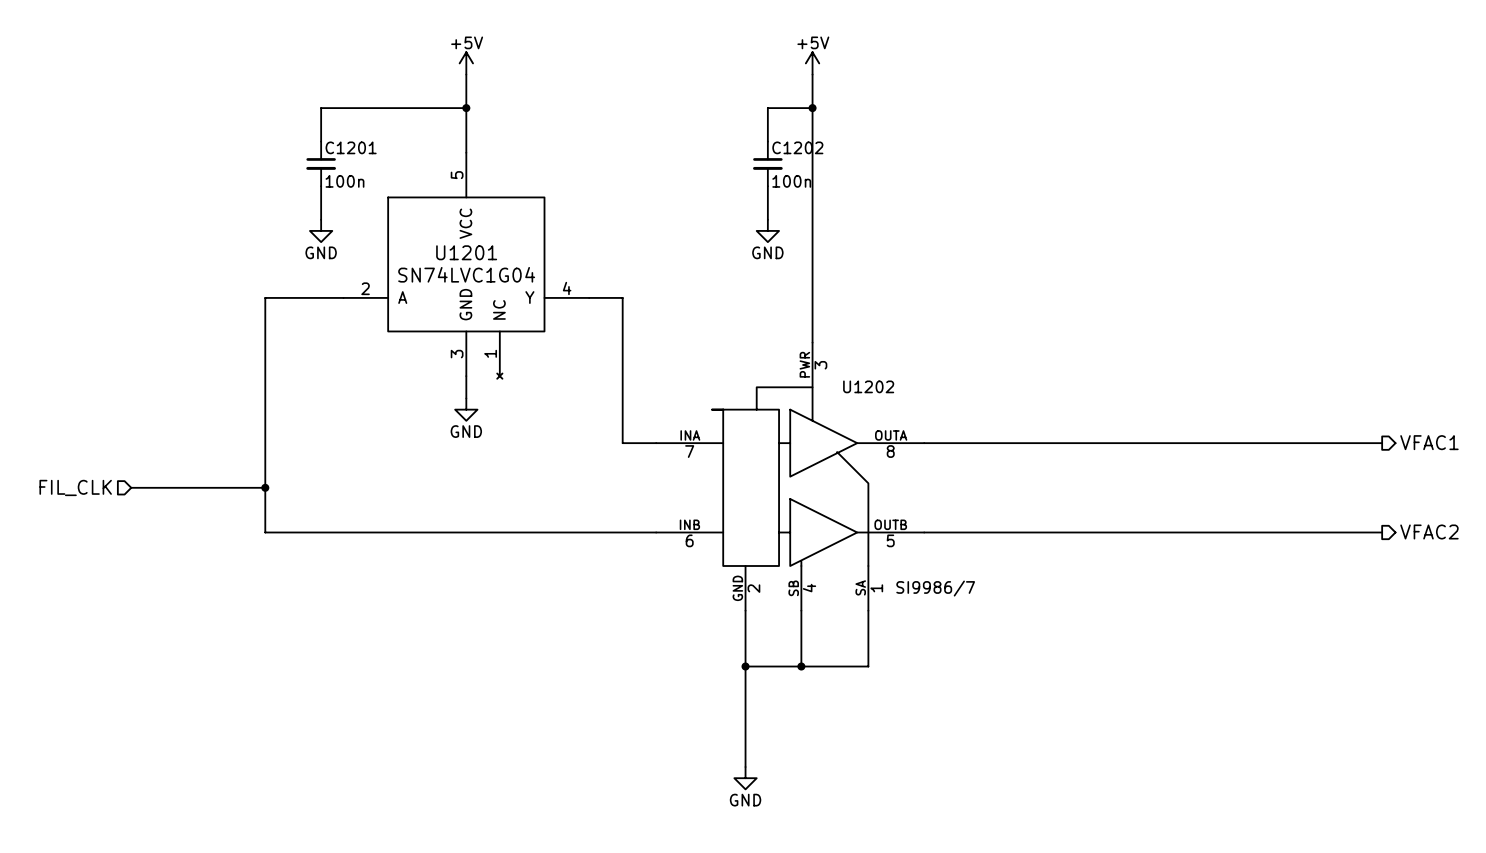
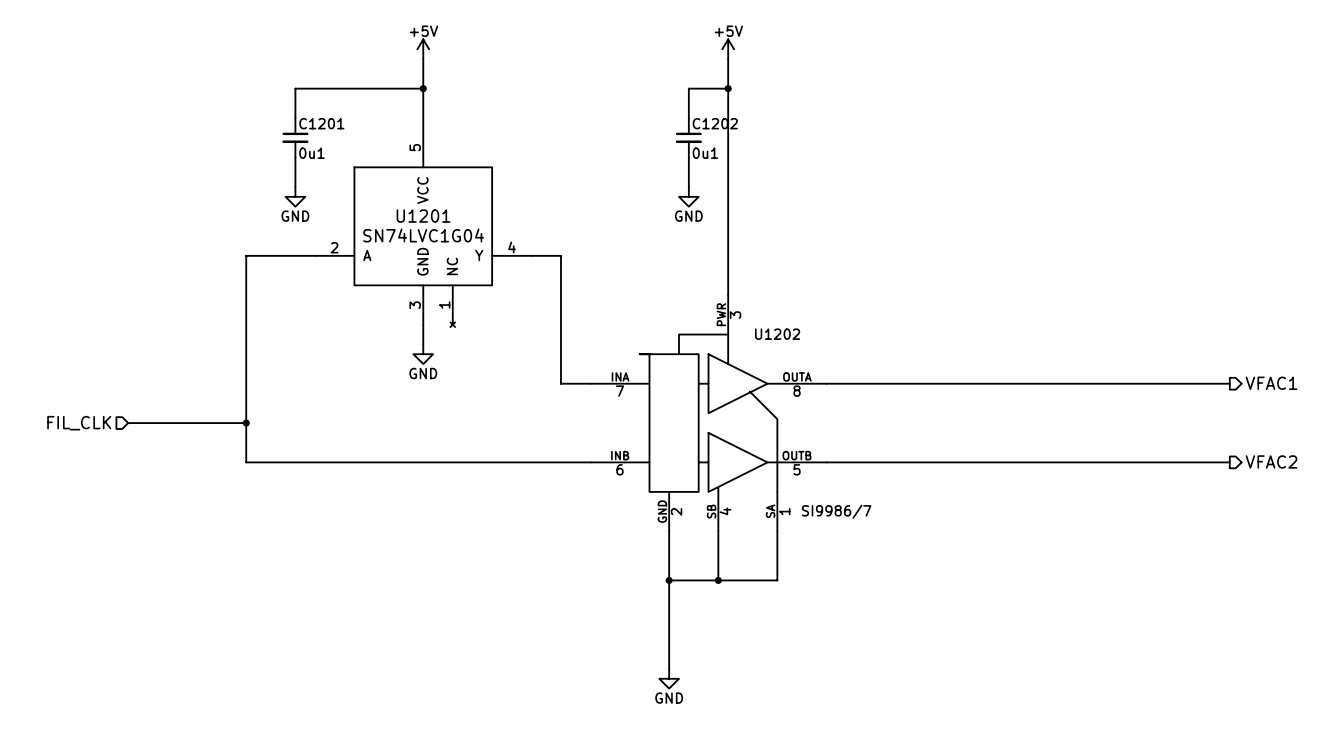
C1201 value: 100n (344, 181) -> 0u1 (311, 153)
C1202 value: 100n (791, 181) -> 0u1 (705, 153)

